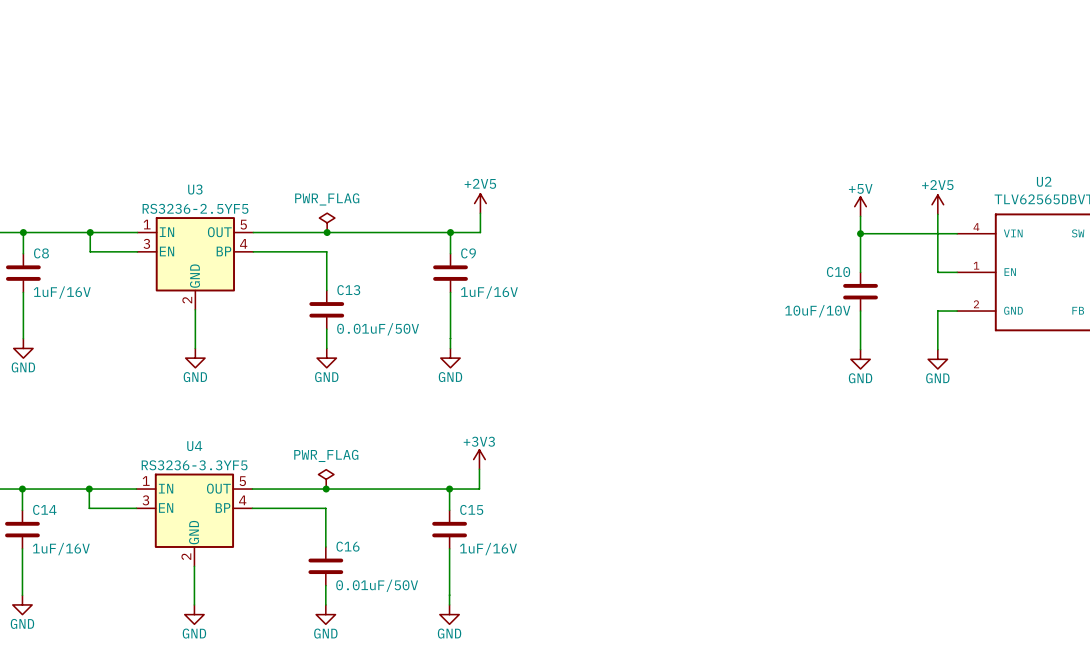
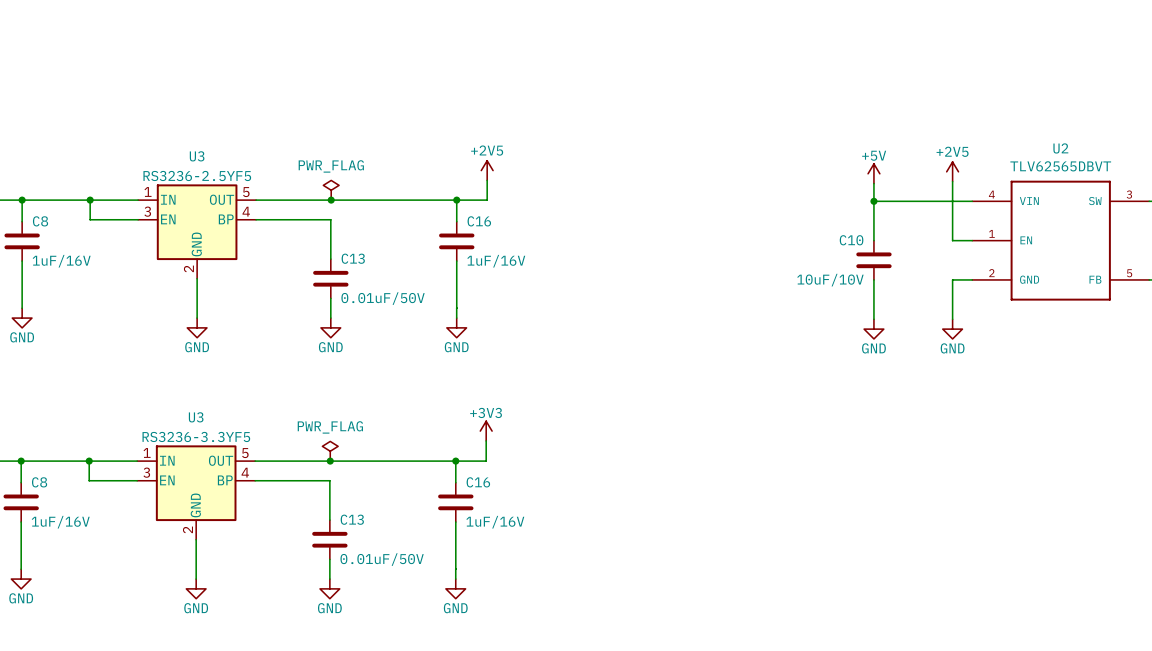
C9 name: C9 (468, 253) -> C16 (479, 221)
U4 name: U4 (194, 446) -> U3 (196, 417)
C14 name: C14 (44, 509) -> C8 (39, 482)
C15 name: C15 (471, 509) -> C16 (478, 482)
C16 name: C16 (347, 546) -> C13 (352, 519)

